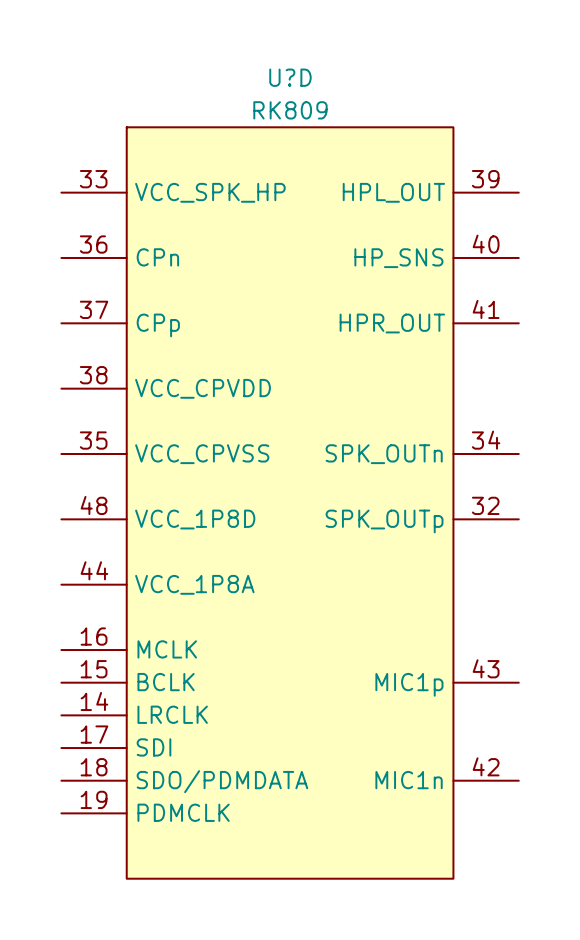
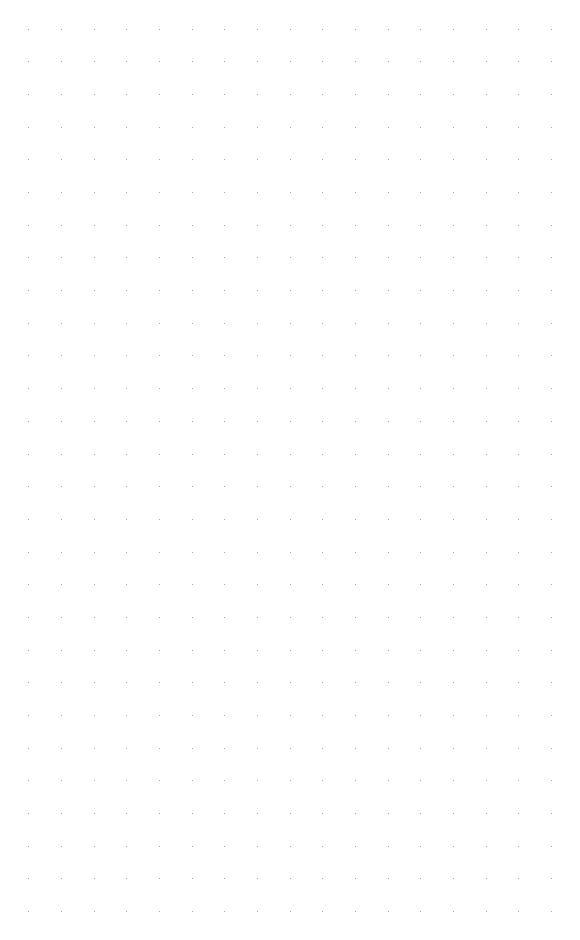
U?D: RK809 (290, 503) -> none

